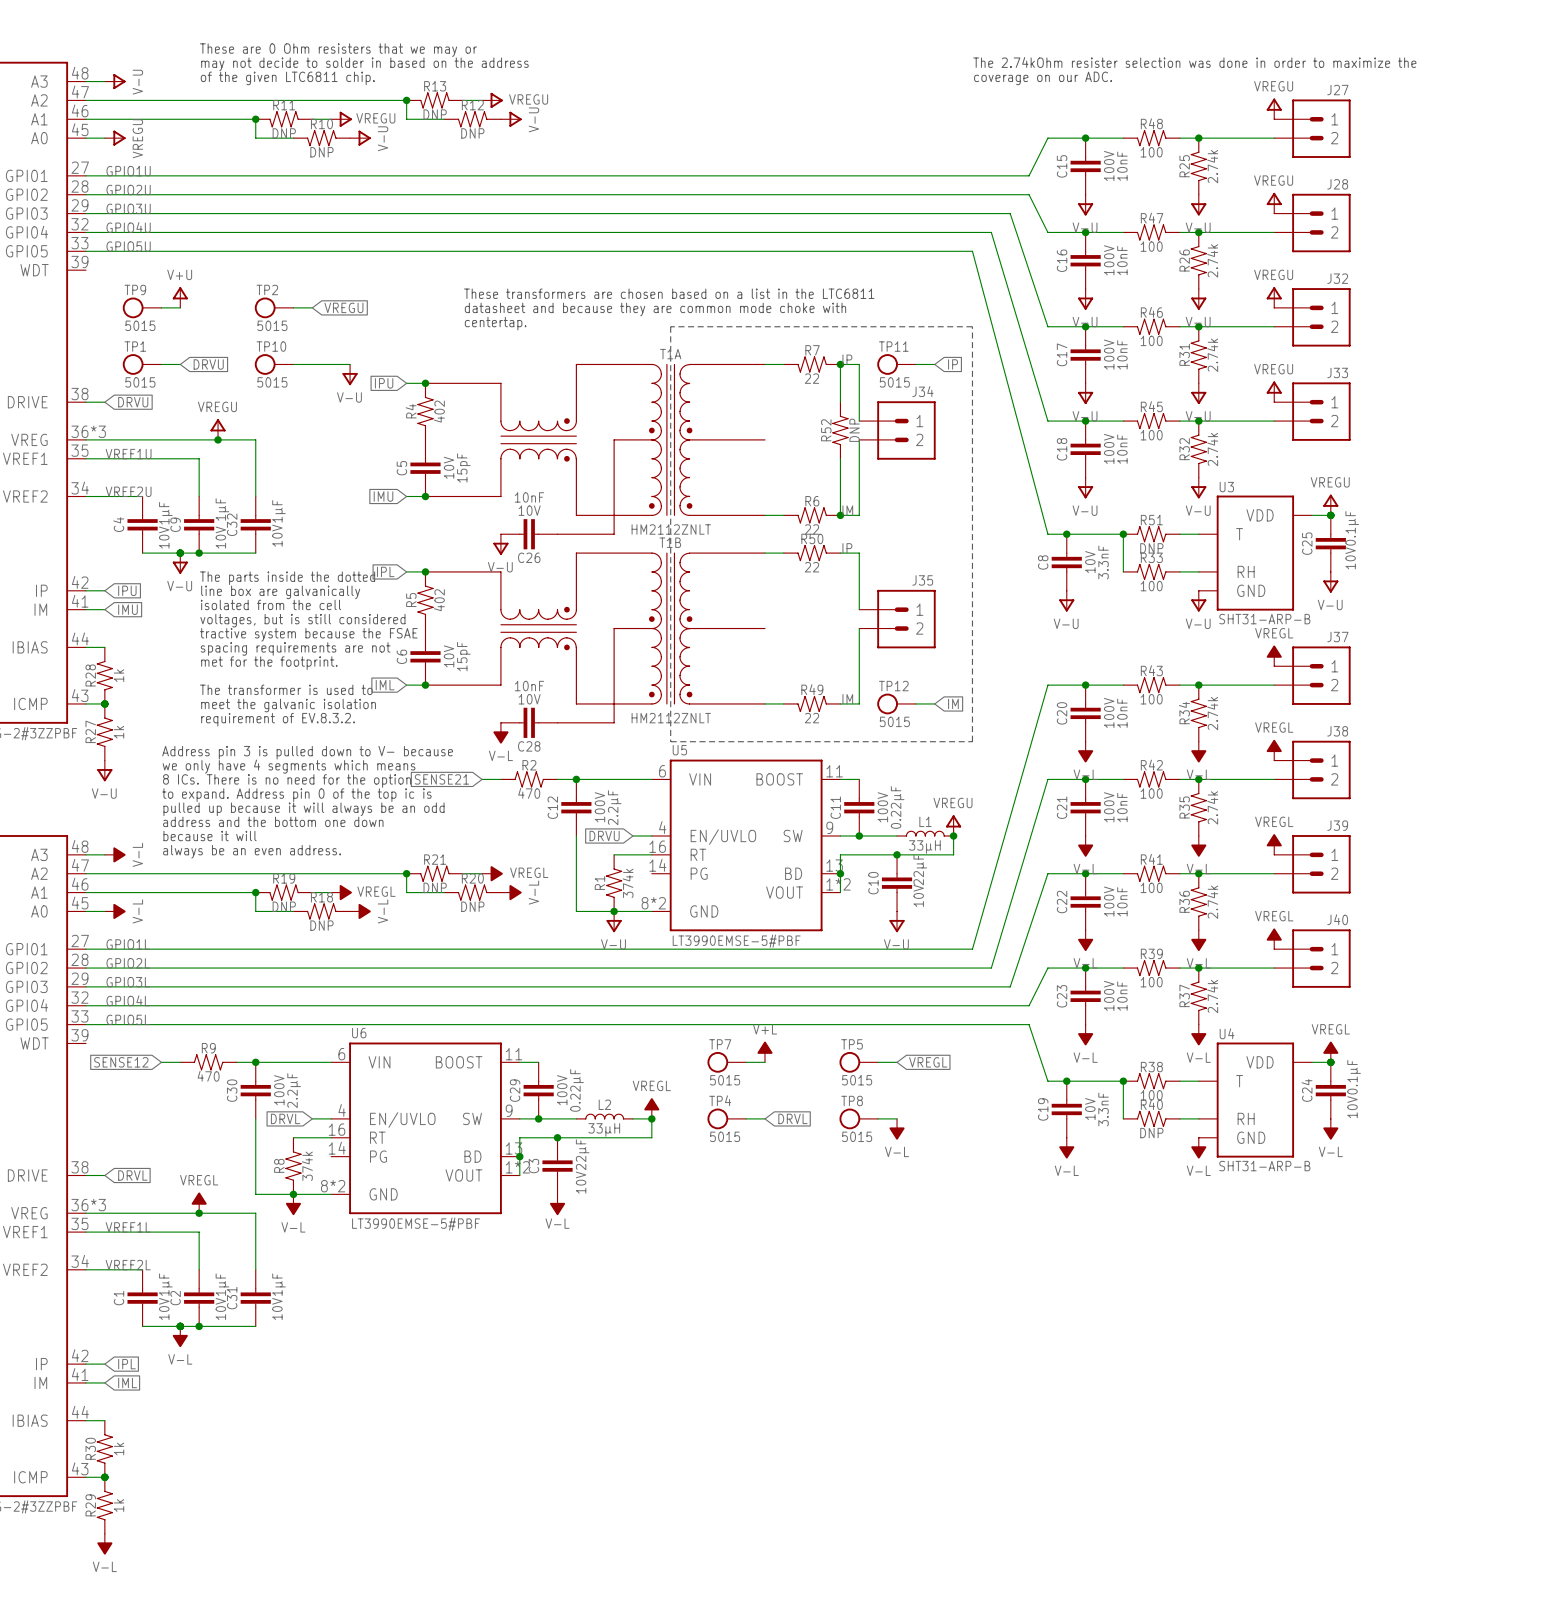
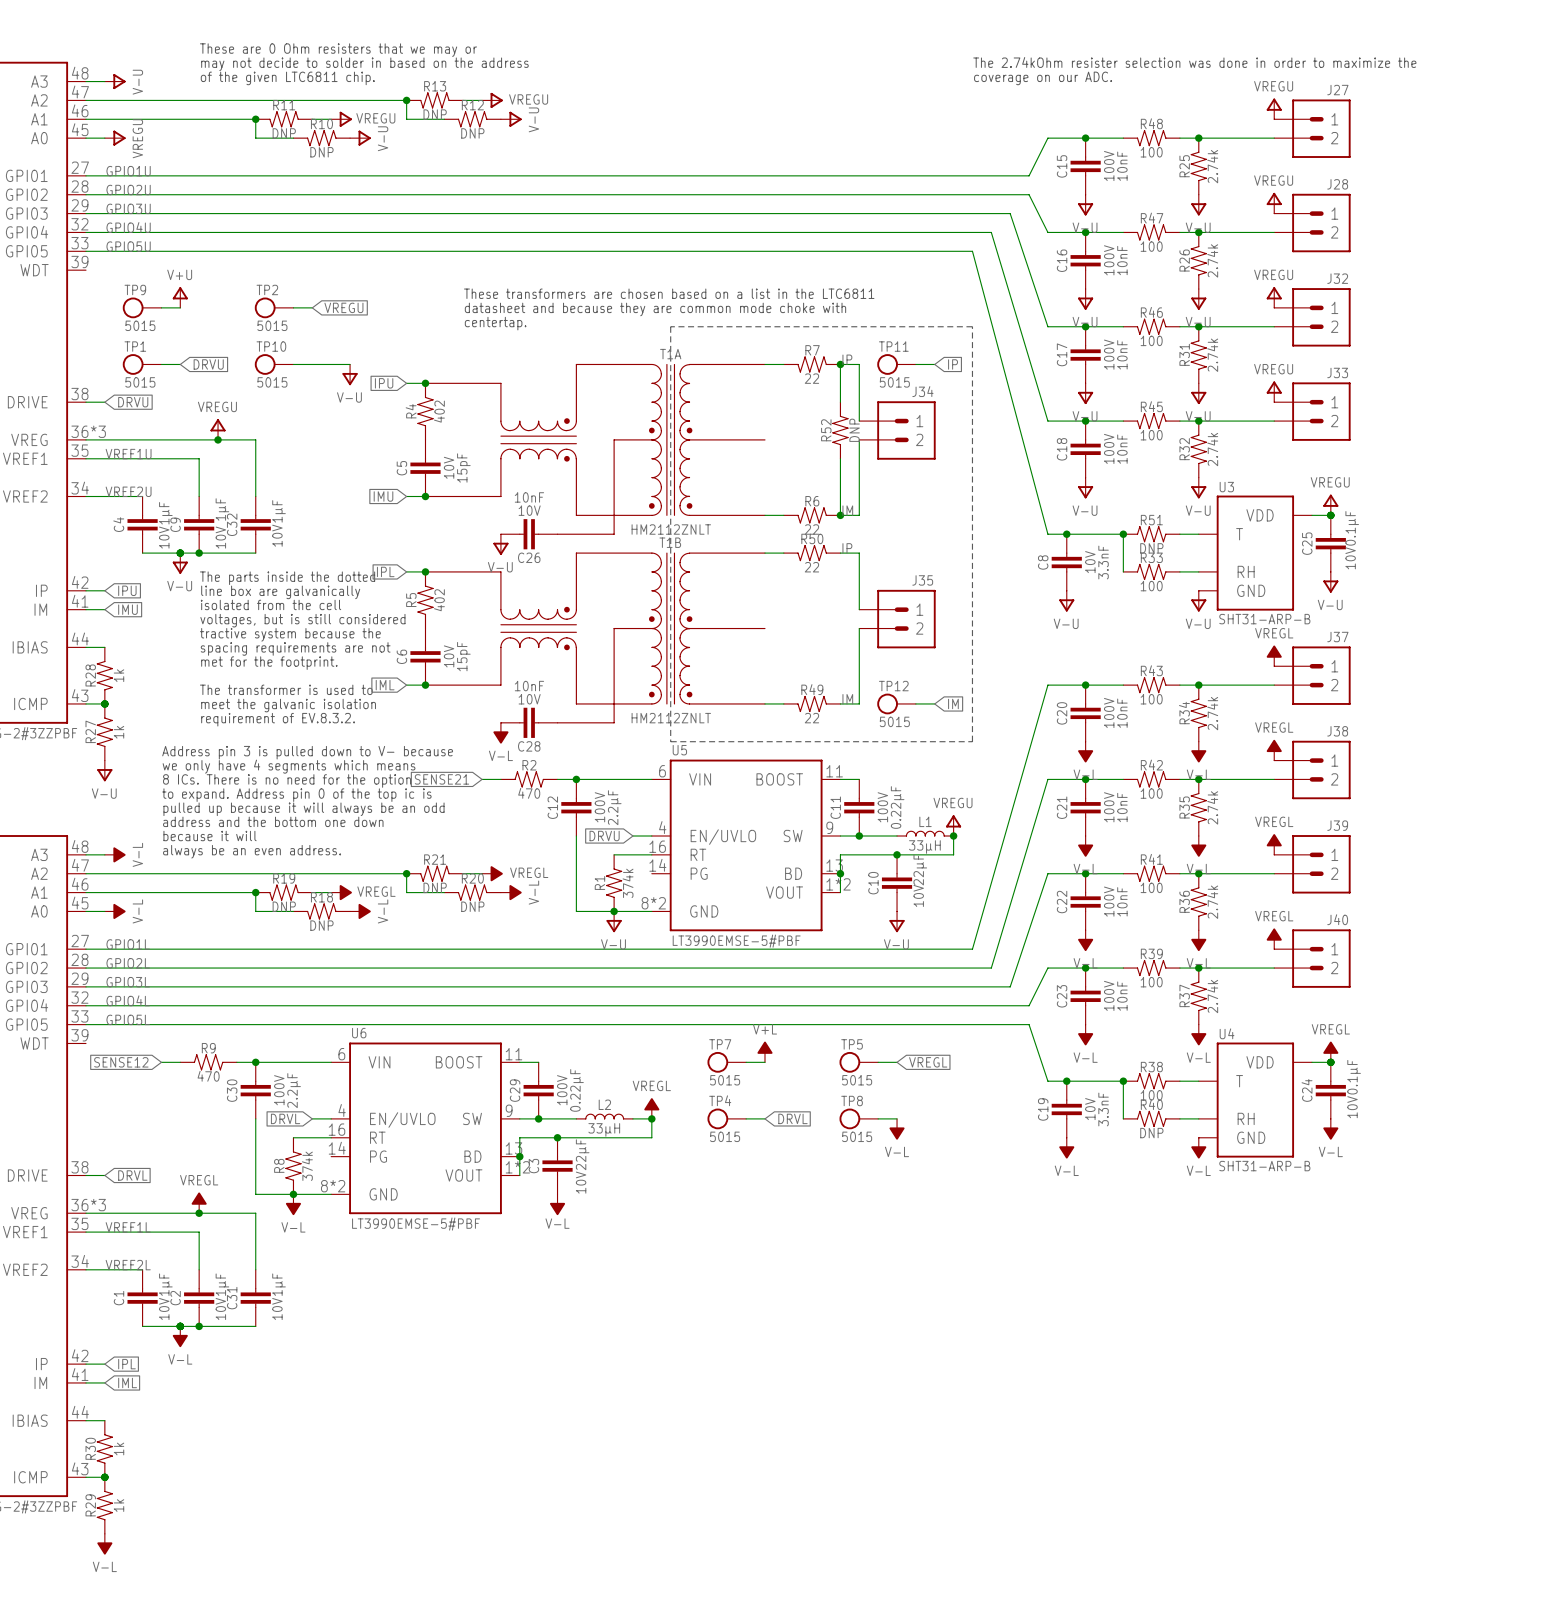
text: tractive system because the FSAE (308, 634) -> tractive system because the (290, 634)

